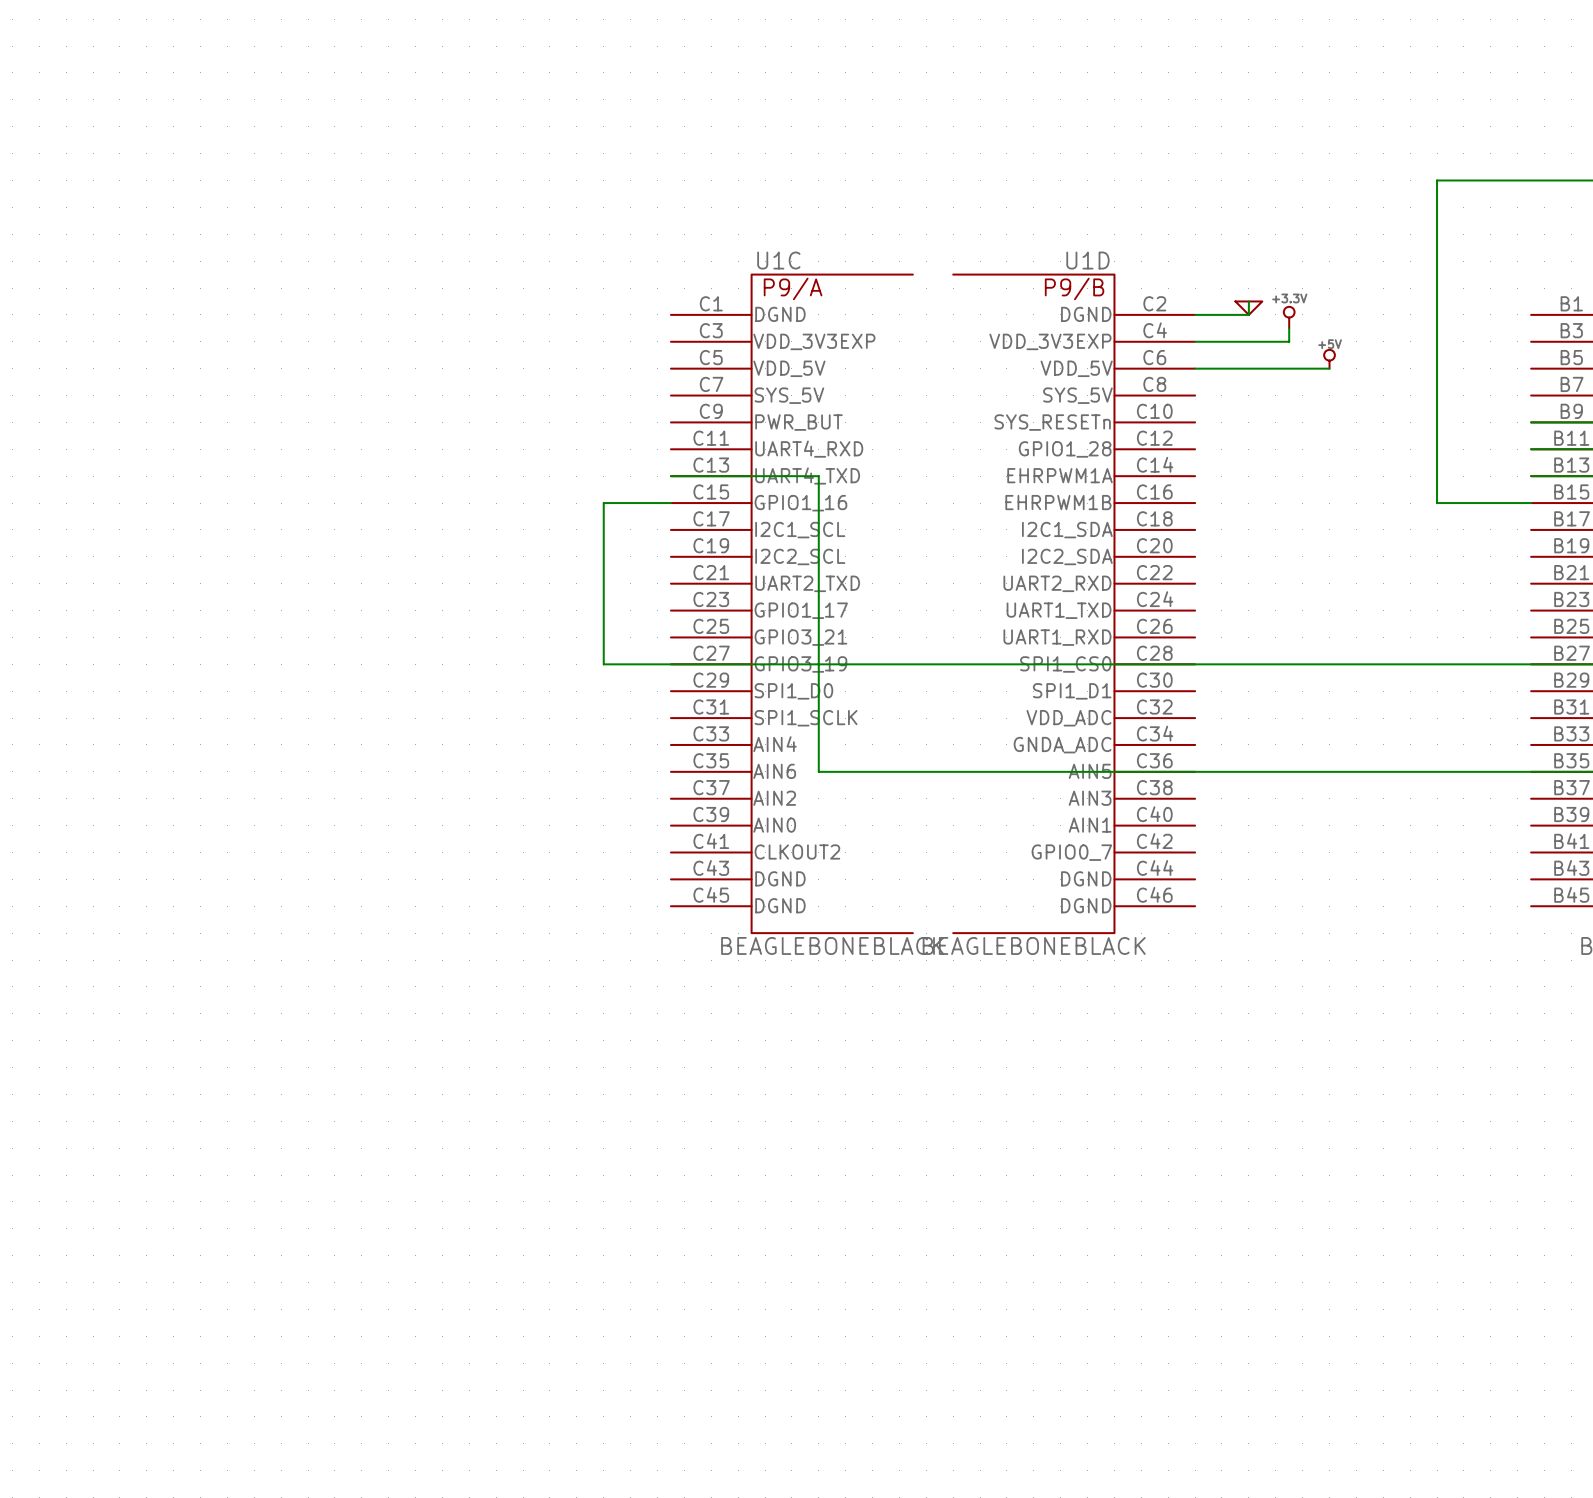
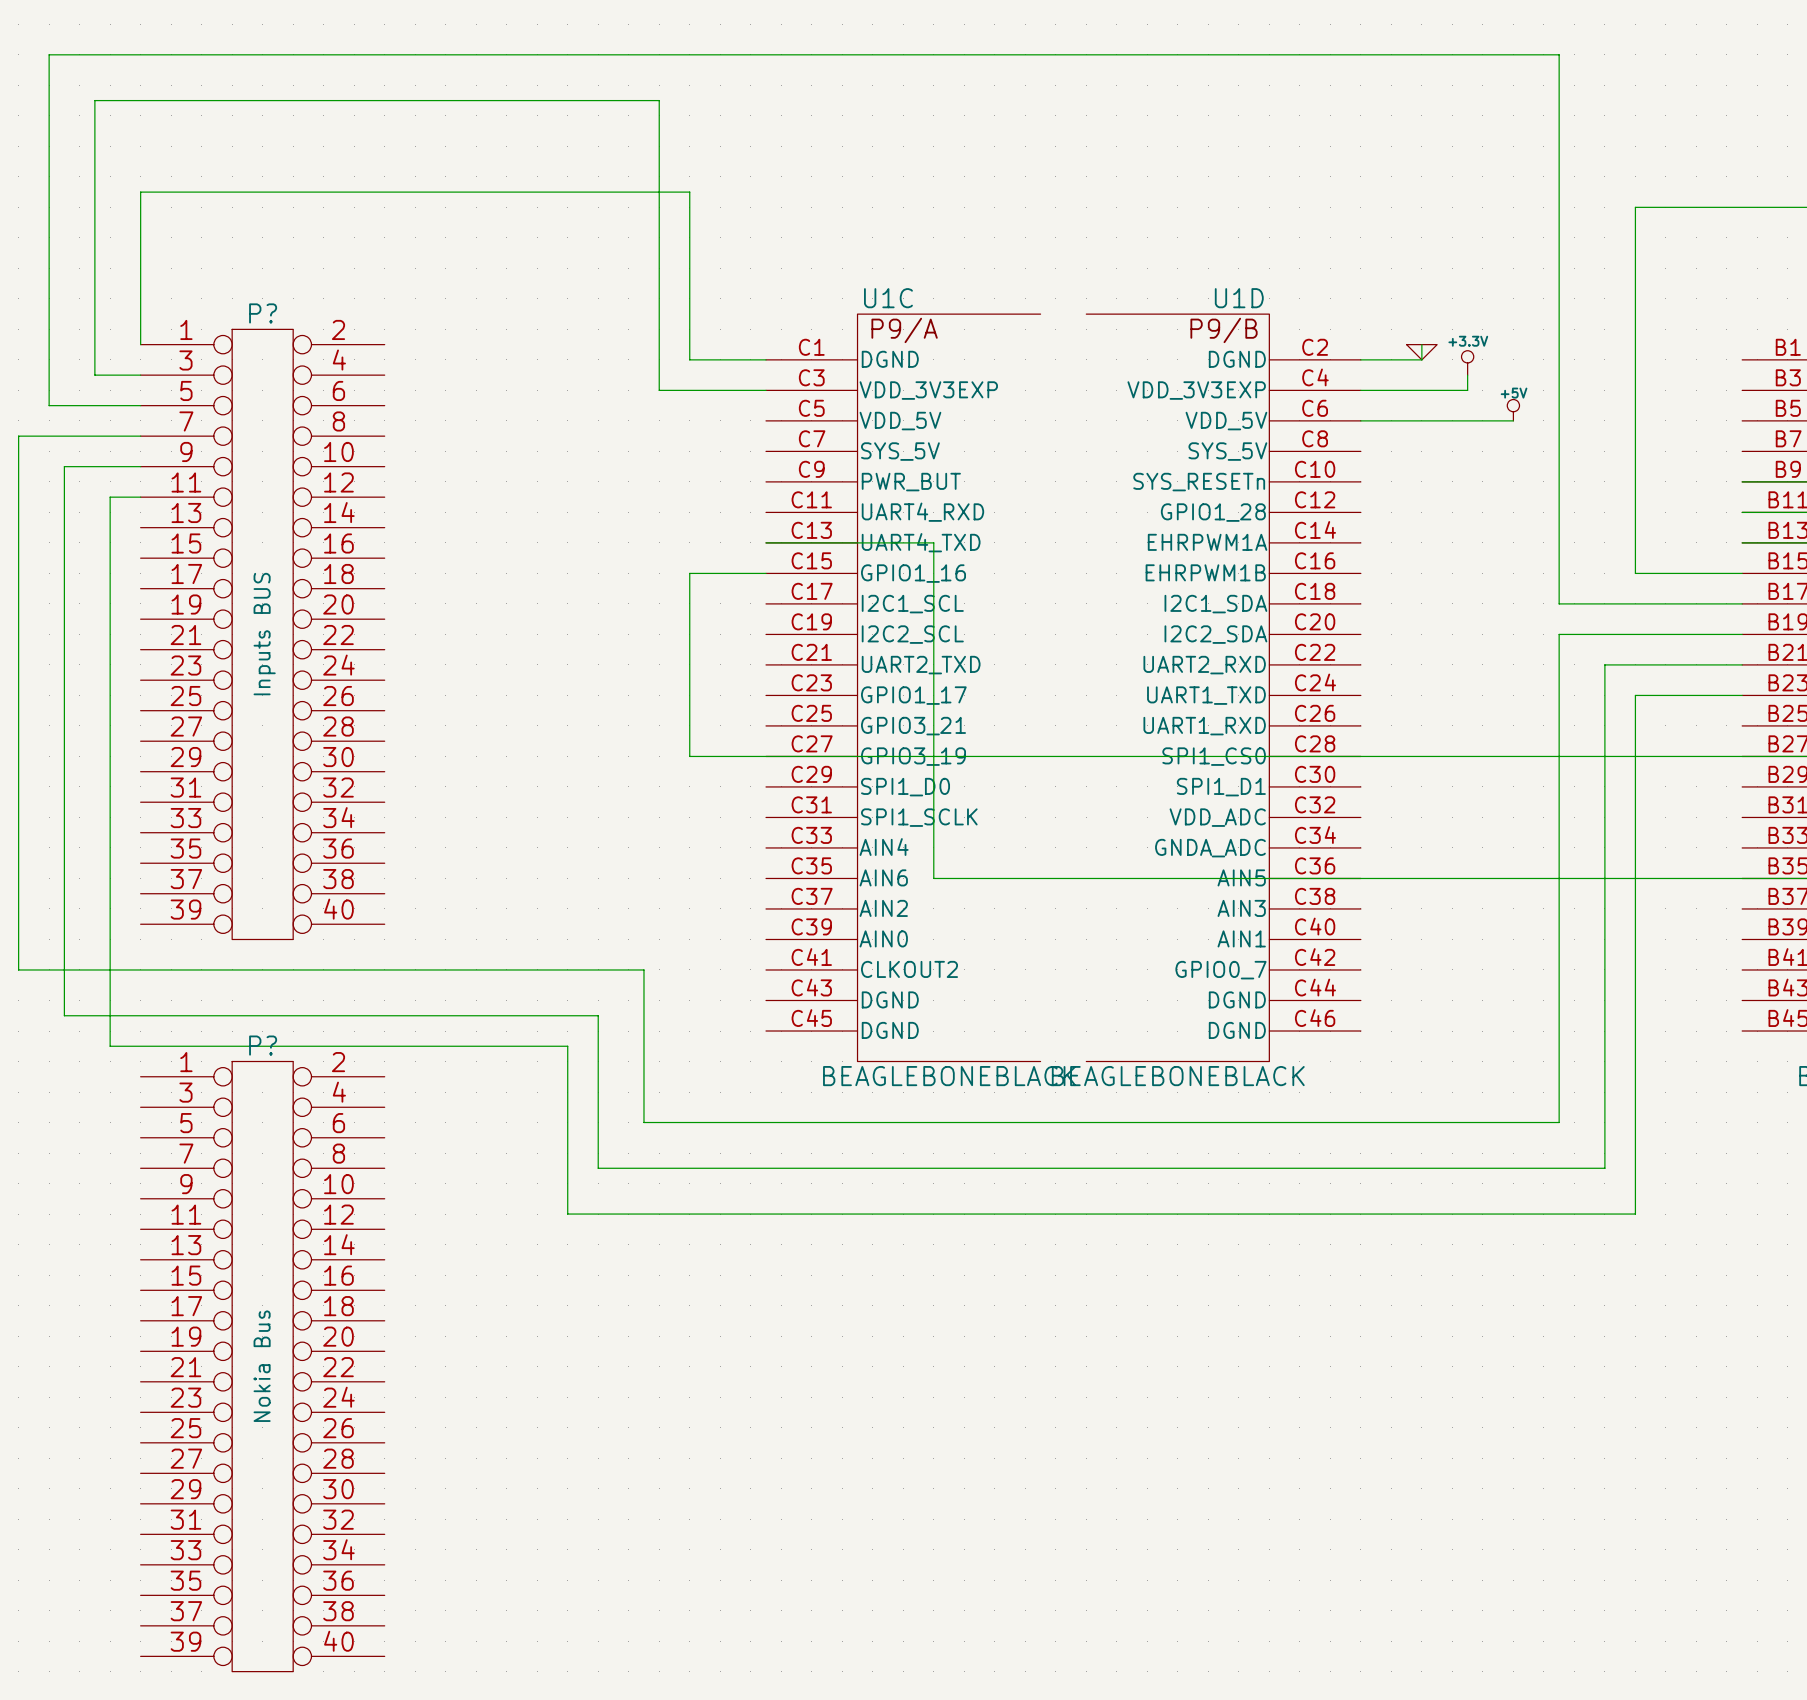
wire: none -> (140, 344) (140, 192) (689, 192) (689, 359) (766, 359)
wire: none -> (140, 375) (94, 375) (94, 100) (659, 100) (659, 390) (766, 390)
wire: none -> (140, 405) (49, 405) (49, 54) (1559, 54) (1559, 603) (1742, 603)
wire: none -> (140, 436) (18, 436) (18, 969) (643, 969) (643, 1122) (1559, 1122) (1559, 634) (1742, 634)
wire: none -> (140, 466) (64, 466) (64, 1015) (598, 1015) (598, 1168) (1604, 1168) (1604, 664) (1742, 664)
wire: none -> (140, 497) (110, 497) (110, 1046) (567, 1046) (567, 1214) (1635, 1214) (1635, 695) (1742, 695)
P?: none -> Inputs BUS (262, 634)
P?: none -> Nokia Bus (262, 1366)

